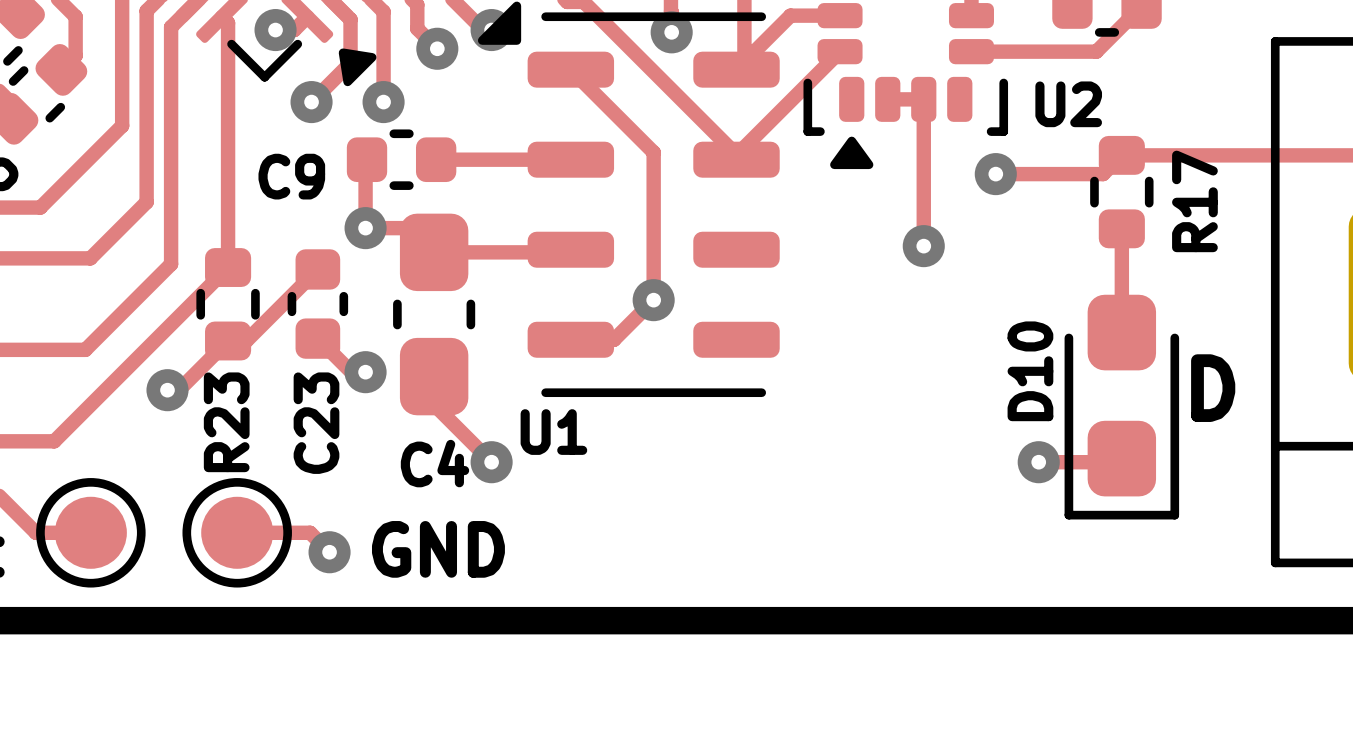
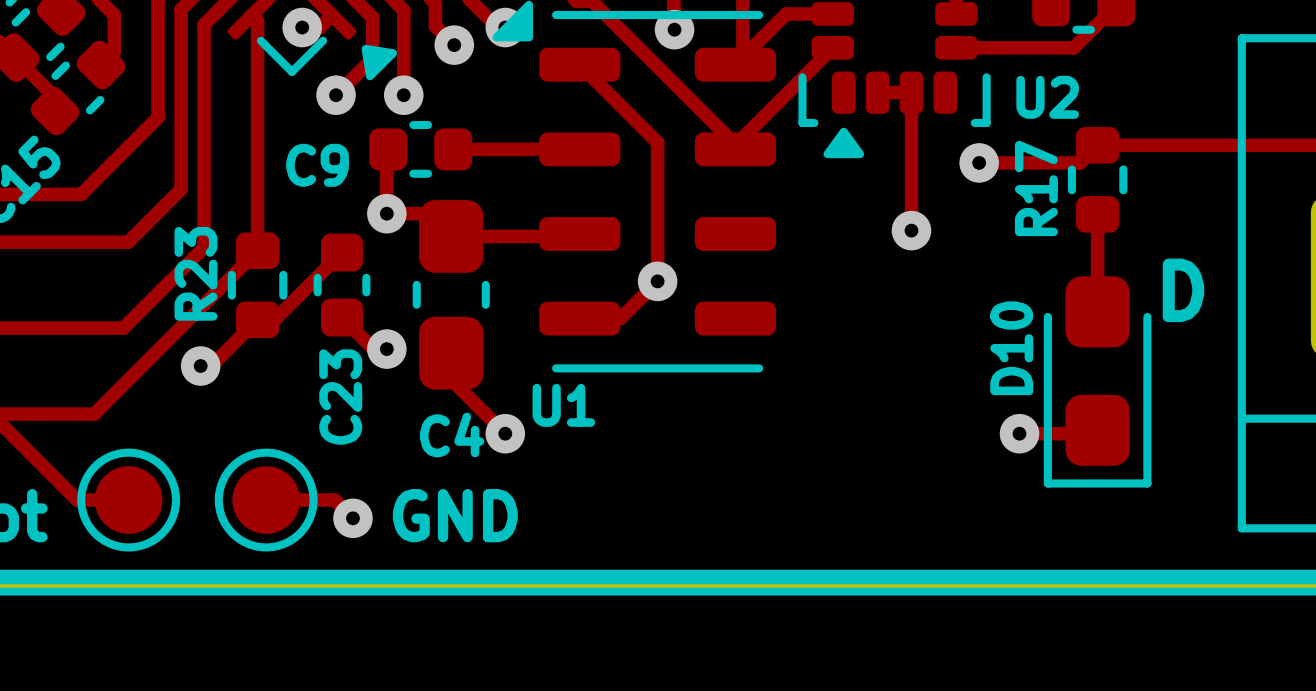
R17 name position: R17 (1194, 201) -> R17 (1036, 188)
text position: D (1213, 388) -> D (1183, 290)
R23 name position: R23 (226, 422) -> R23 (195, 273)

